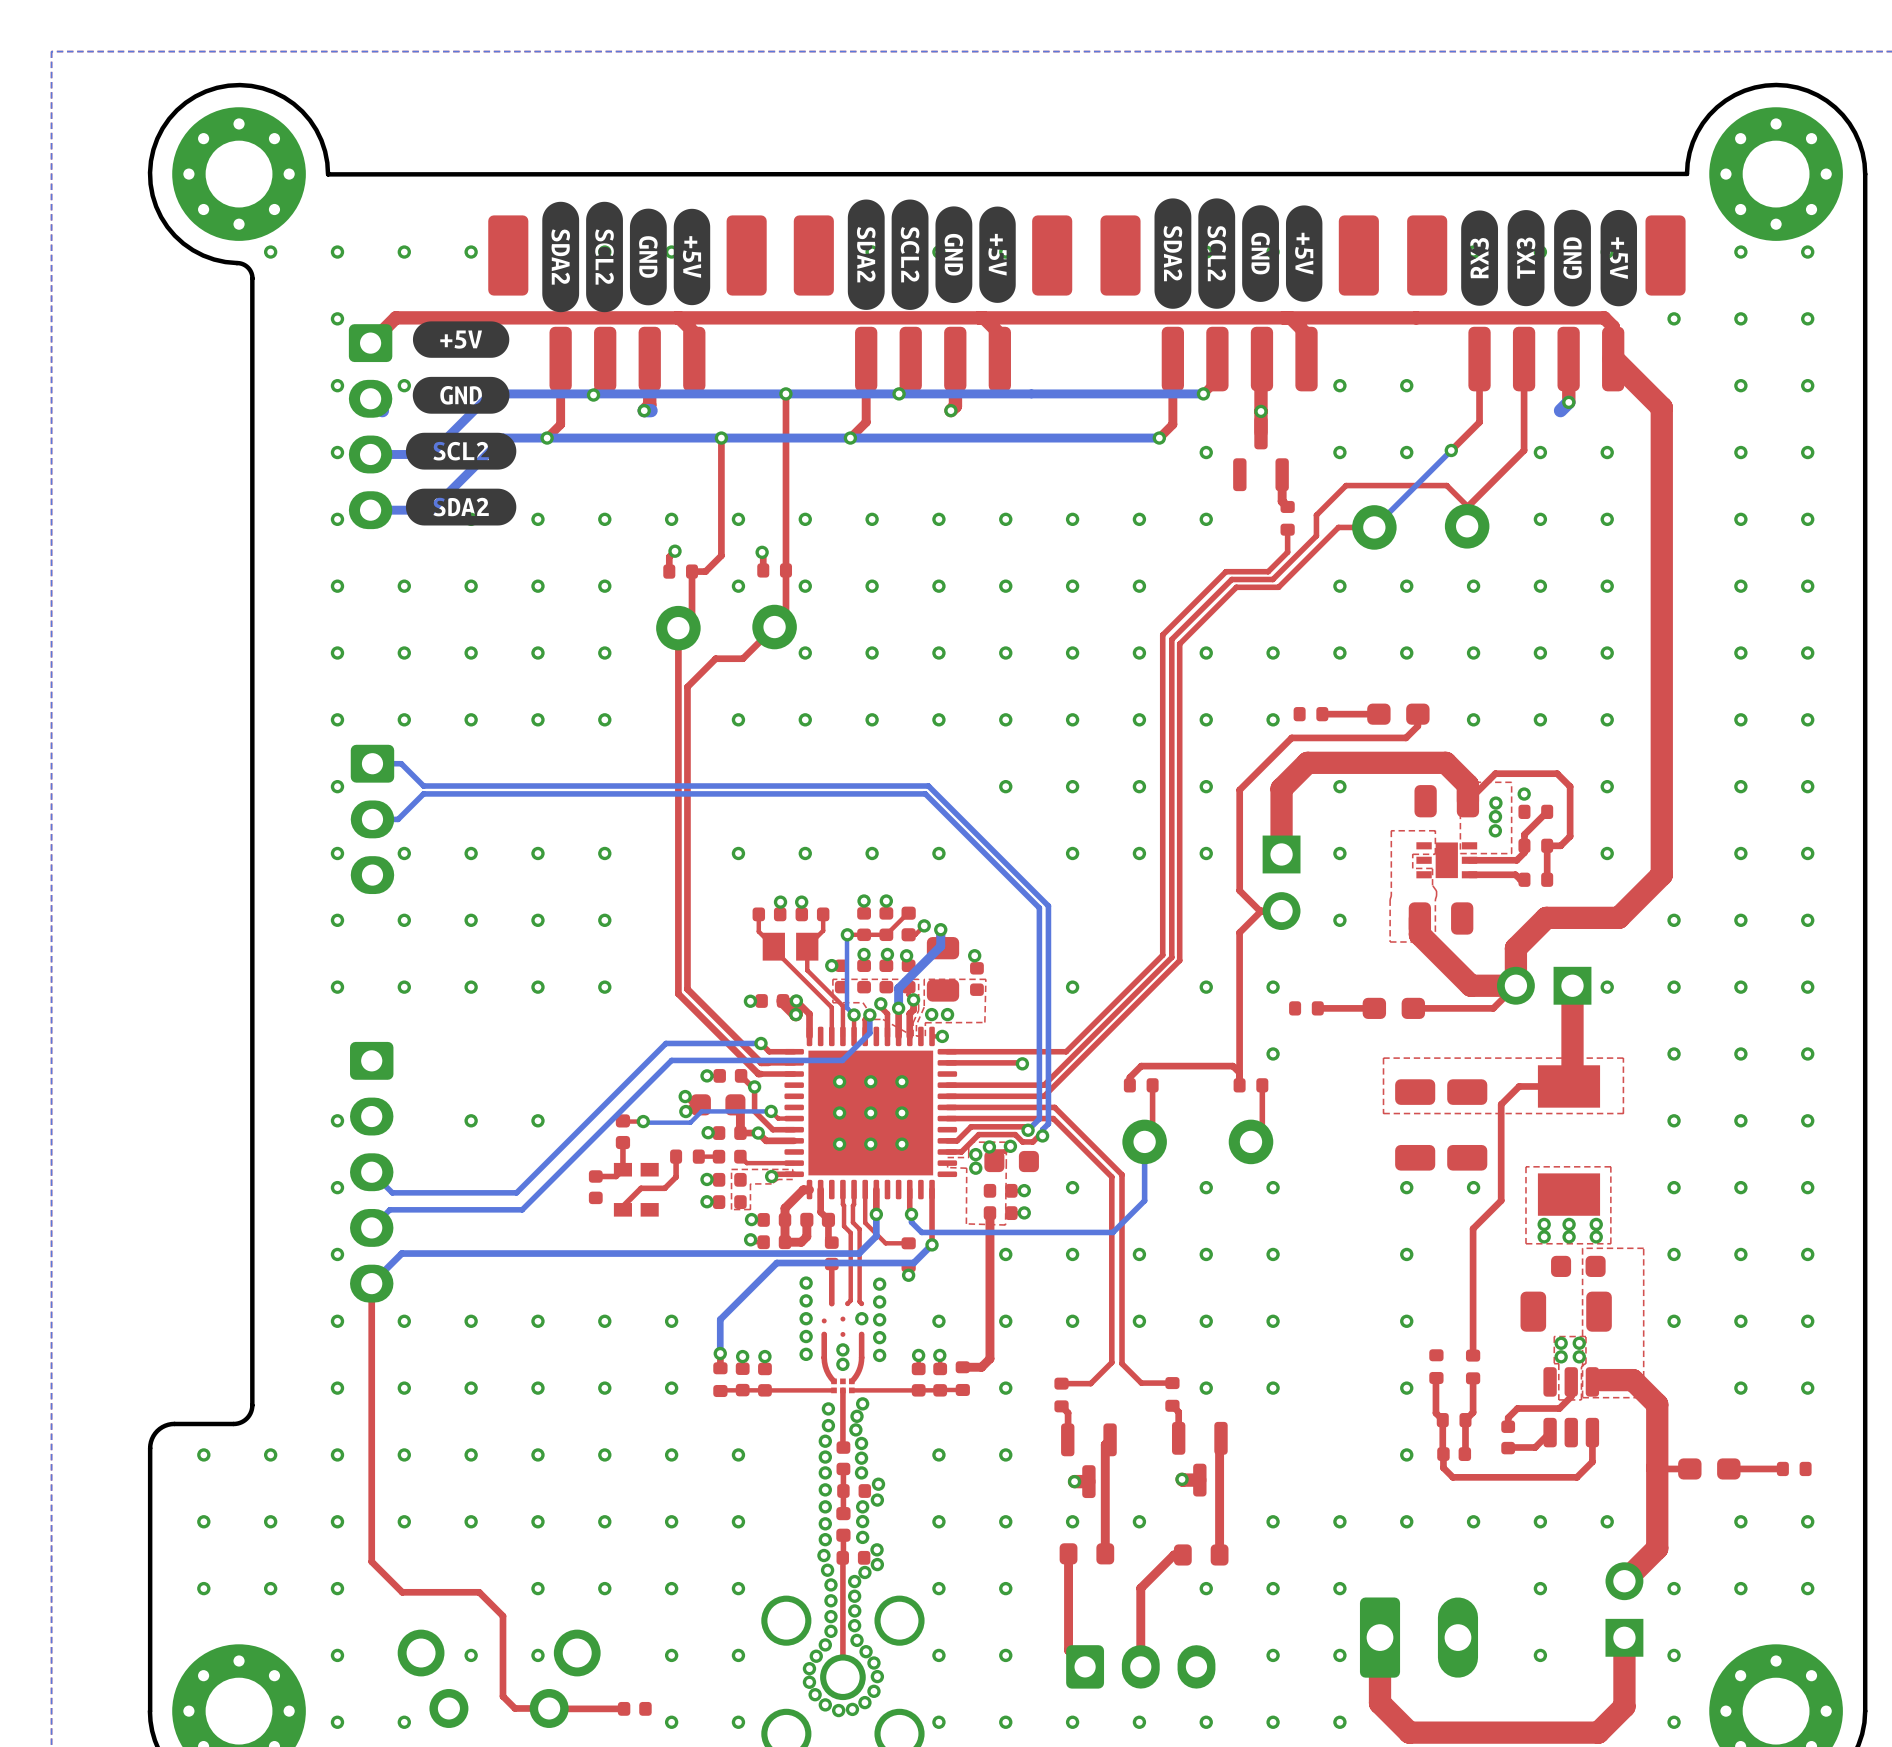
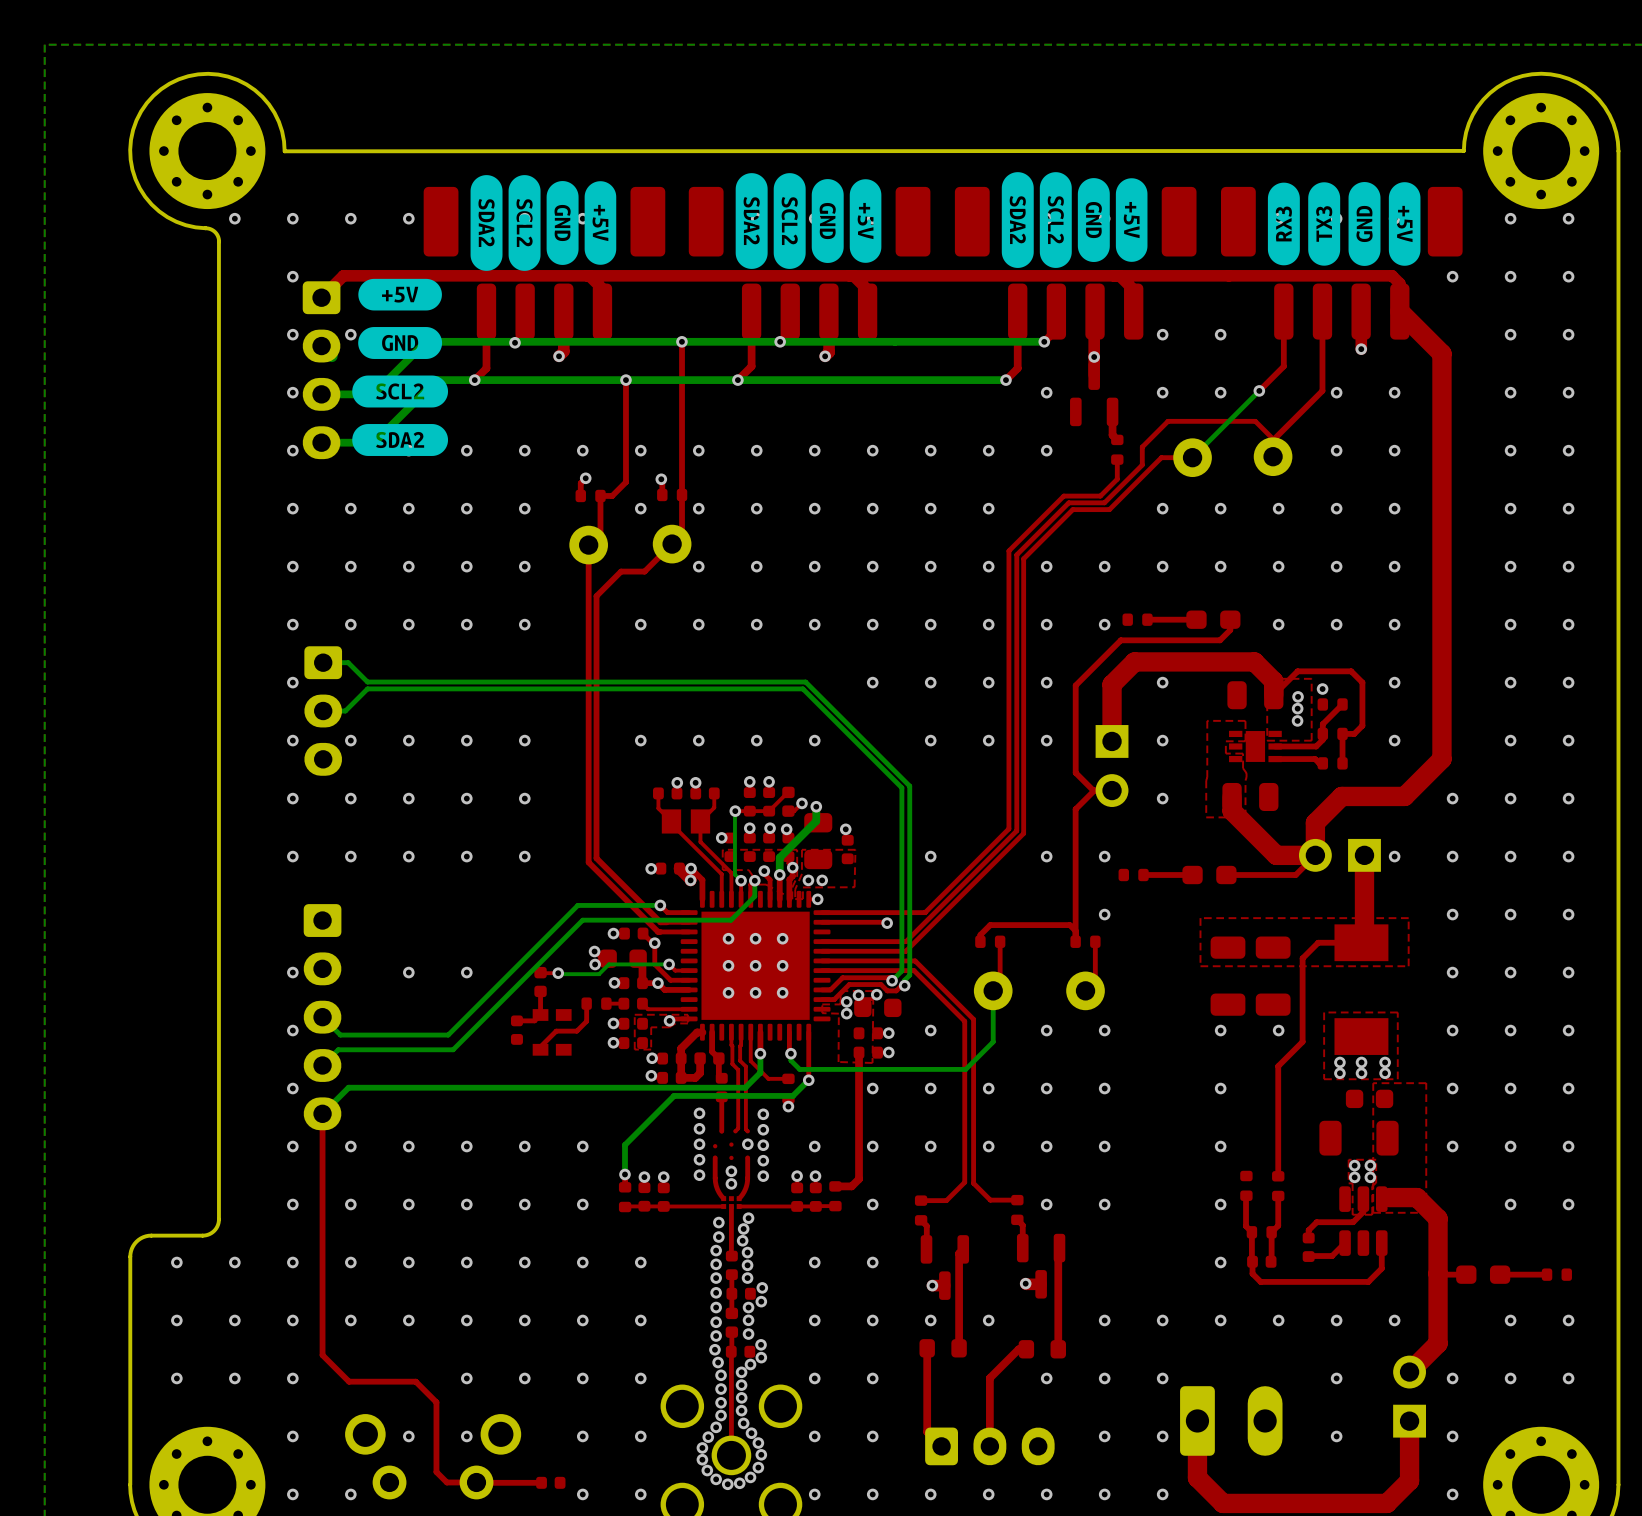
bottom track: (1568, 402) (1560, 410) -> none
bottom track: (651, 410) (644, 410) -> none

